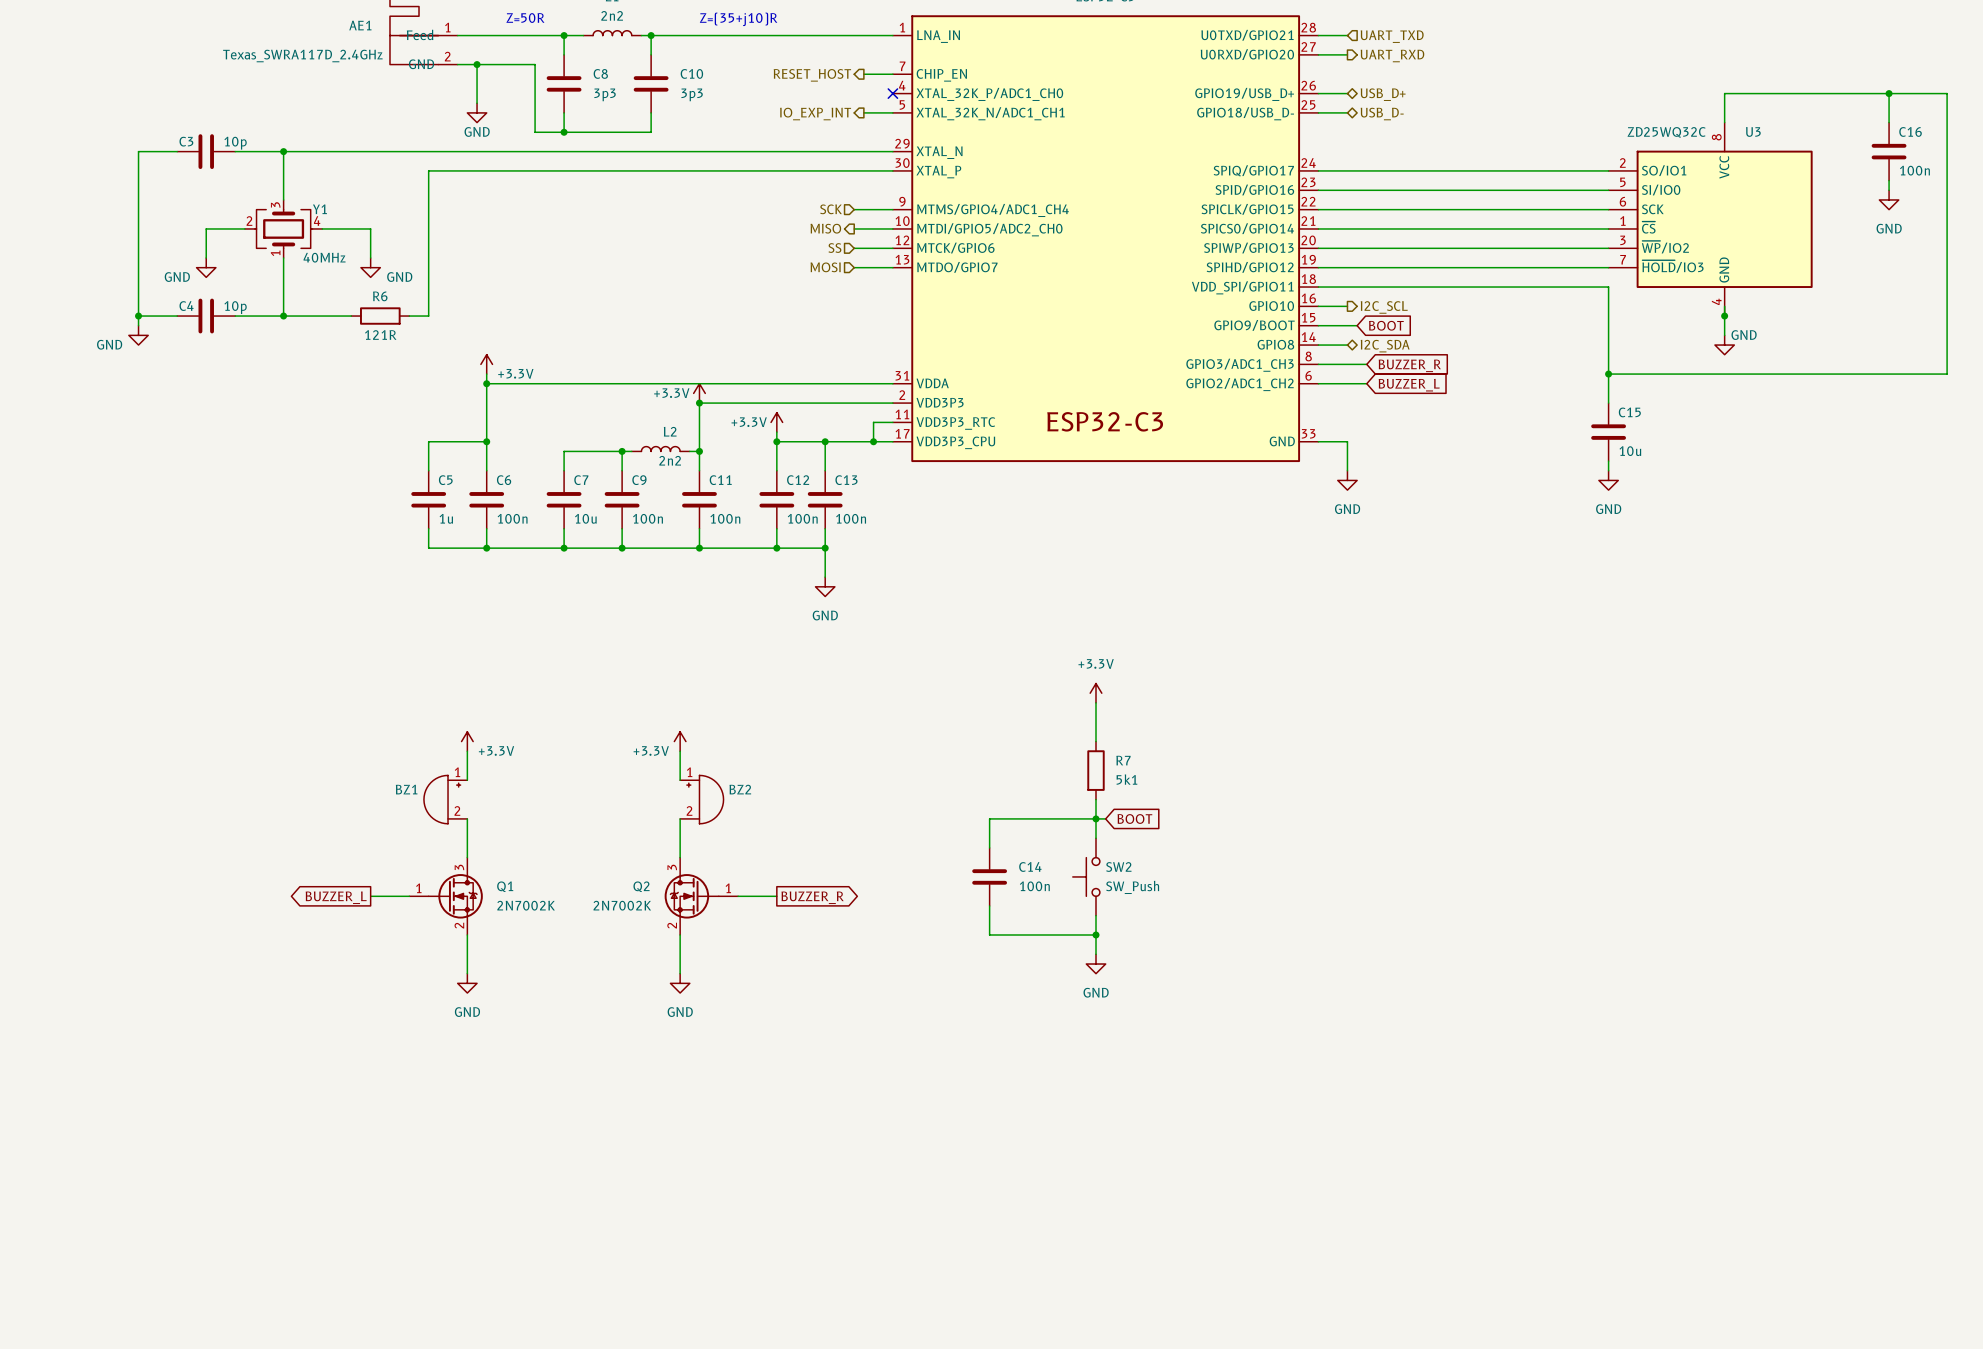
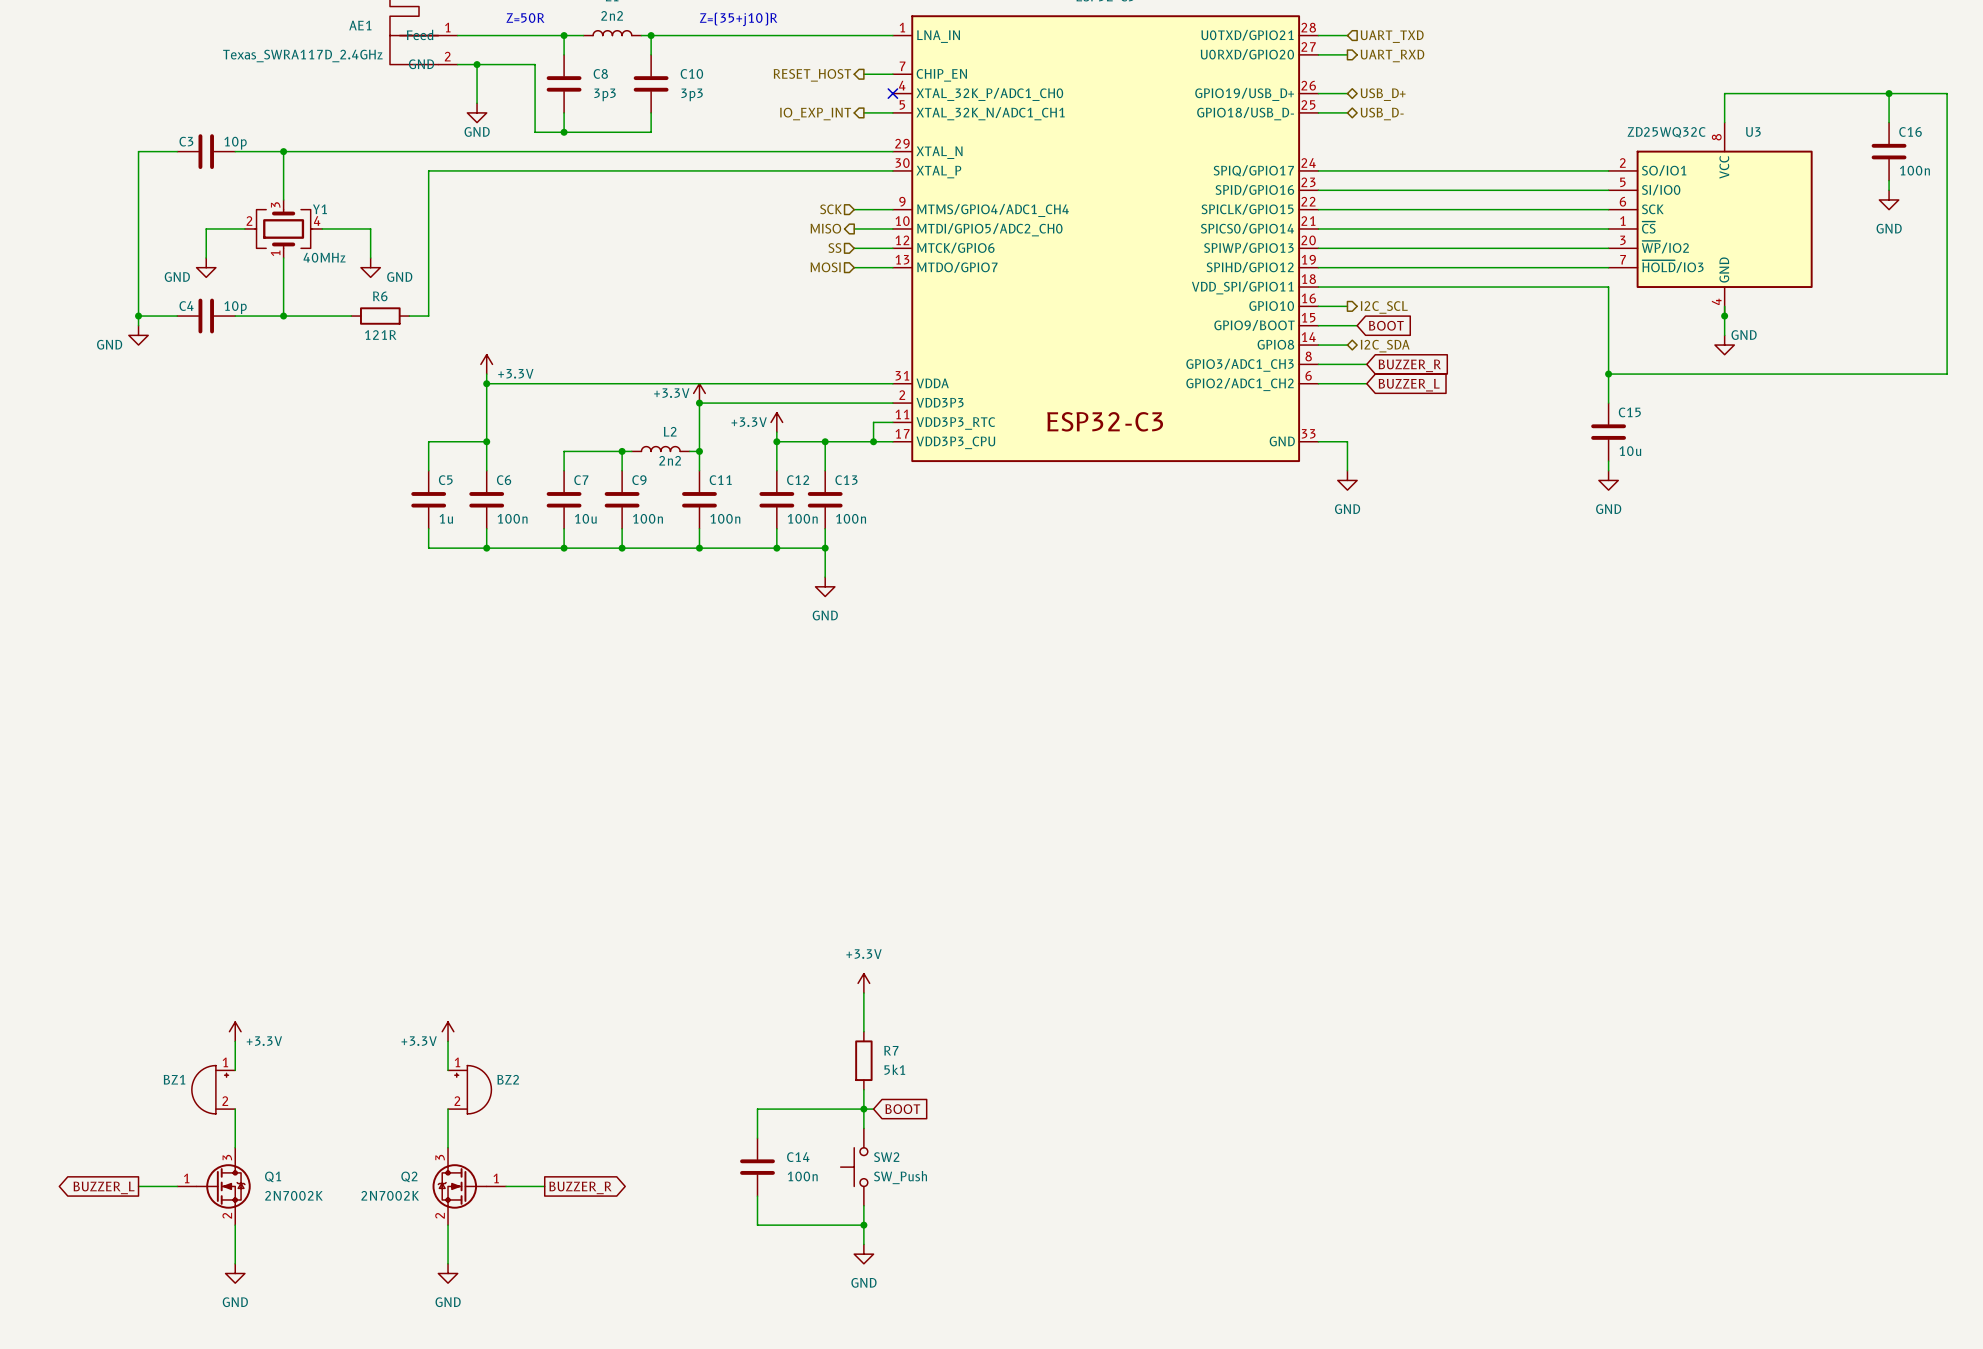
power symbol: +3.3V (1096, 693) -> none
wire: (1096, 702) (1096, 741) -> none
power symbol: +3.3V (467, 741) -> none
power symbol: +3.3V (680, 741) -> none
wire: (467, 751) (467, 780) -> none
wire: (680, 751) (680, 780) -> none
R7 position: (1096, 770) -> (863, 1060)
BZ1 position: (445, 799) -> (213, 1089)
BZ2 position: (701, 799) -> (469, 1089)
wire: (1096, 799) (1096, 838) -> none
wire: (467, 818) (467, 857) -> none
wire: (680, 818) (680, 857) -> none
junction: (1096, 818) -> none
wire: (1105, 818) (989, 818) (989, 847) -> none
global label: BOOT (1134, 819) -> none
C14 position: (989, 876) -> (757, 1167)
SW2 position: (1086, 876) -> (854, 1167)
wire: (370, 896) (409, 896) -> none
Q1 position: (446, 896) -> (213, 1186)
Q2 position: (701, 896) -> (469, 1186)
wire: (738, 896) (776, 896) -> none
global label: BUZZER_L (336, 897) -> none
global label: BUZZER_R (812, 897) -> none
wire: (989, 905) (989, 934) (1096, 934) -> none
wire: (1096, 915) (1096, 954) -> none
wire: (467, 934) (467, 973) -> (448, 1109) (448, 1147)
wire: (680, 934) (680, 973) -> none
junction: (1096, 934) -> none
power symbol: GND (1096, 964) -> none
power symbol: GND (467, 983) -> none
power symbol: GND (680, 983) -> none
power symbol: none -> +3.3V (863, 983)
wire: none -> (863, 993) (863, 1031)
power symbol: none -> +3.3V (235, 1031)
power symbol: none -> +3.3V (448, 1031)
wire: none -> (235, 1041) (235, 1070)
wire: none -> (448, 1041) (448, 1070)
wire: none -> (863, 1089) (863, 1128)
wire: none -> (235, 1109) (235, 1147)
junction: none -> (863, 1109)
wire: none -> (873, 1109) (757, 1109) (757, 1138)
global label: none -> BOOT (902, 1109)
wire: none -> (138, 1186) (177, 1186)
wire: none -> (506, 1186) (544, 1186)
global label: none -> BUZZER_L (104, 1187)
global label: none -> BUZZER_R (580, 1187)
wire: none -> (757, 1196) (757, 1225) (863, 1225)
wire: none -> (863, 1205) (863, 1244)
wire: none -> (235, 1225) (235, 1263)
wire: none -> (448, 1225) (448, 1263)
junction: none -> (863, 1225)
power symbol: none -> GND (863, 1254)
power symbol: none -> GND (235, 1273)
power symbol: none -> GND (448, 1273)

